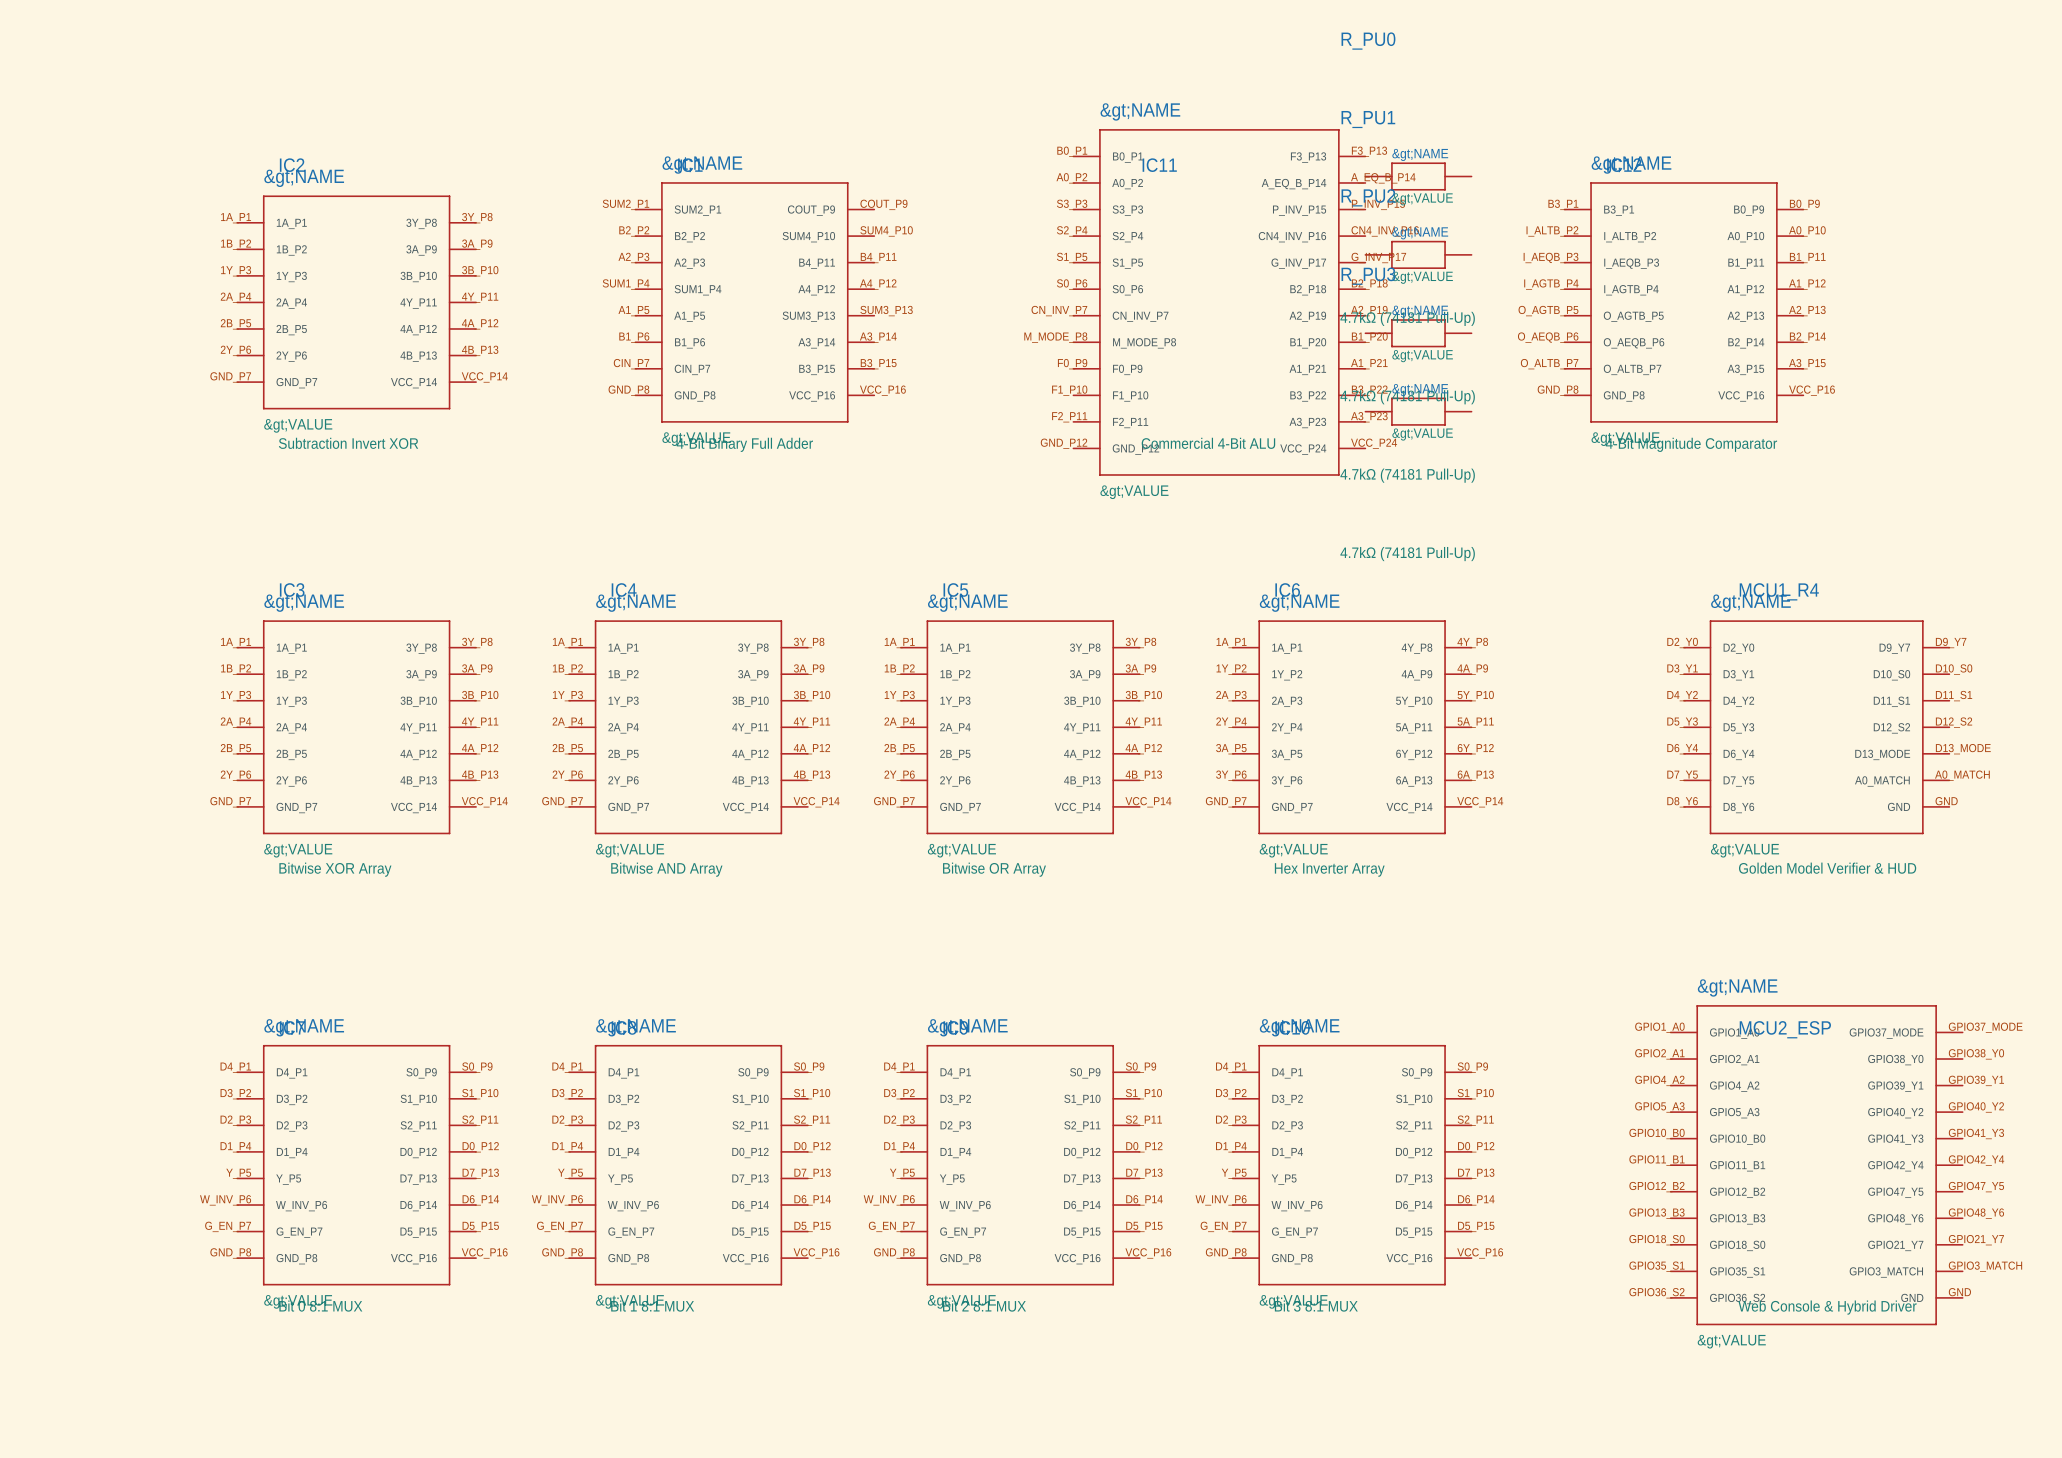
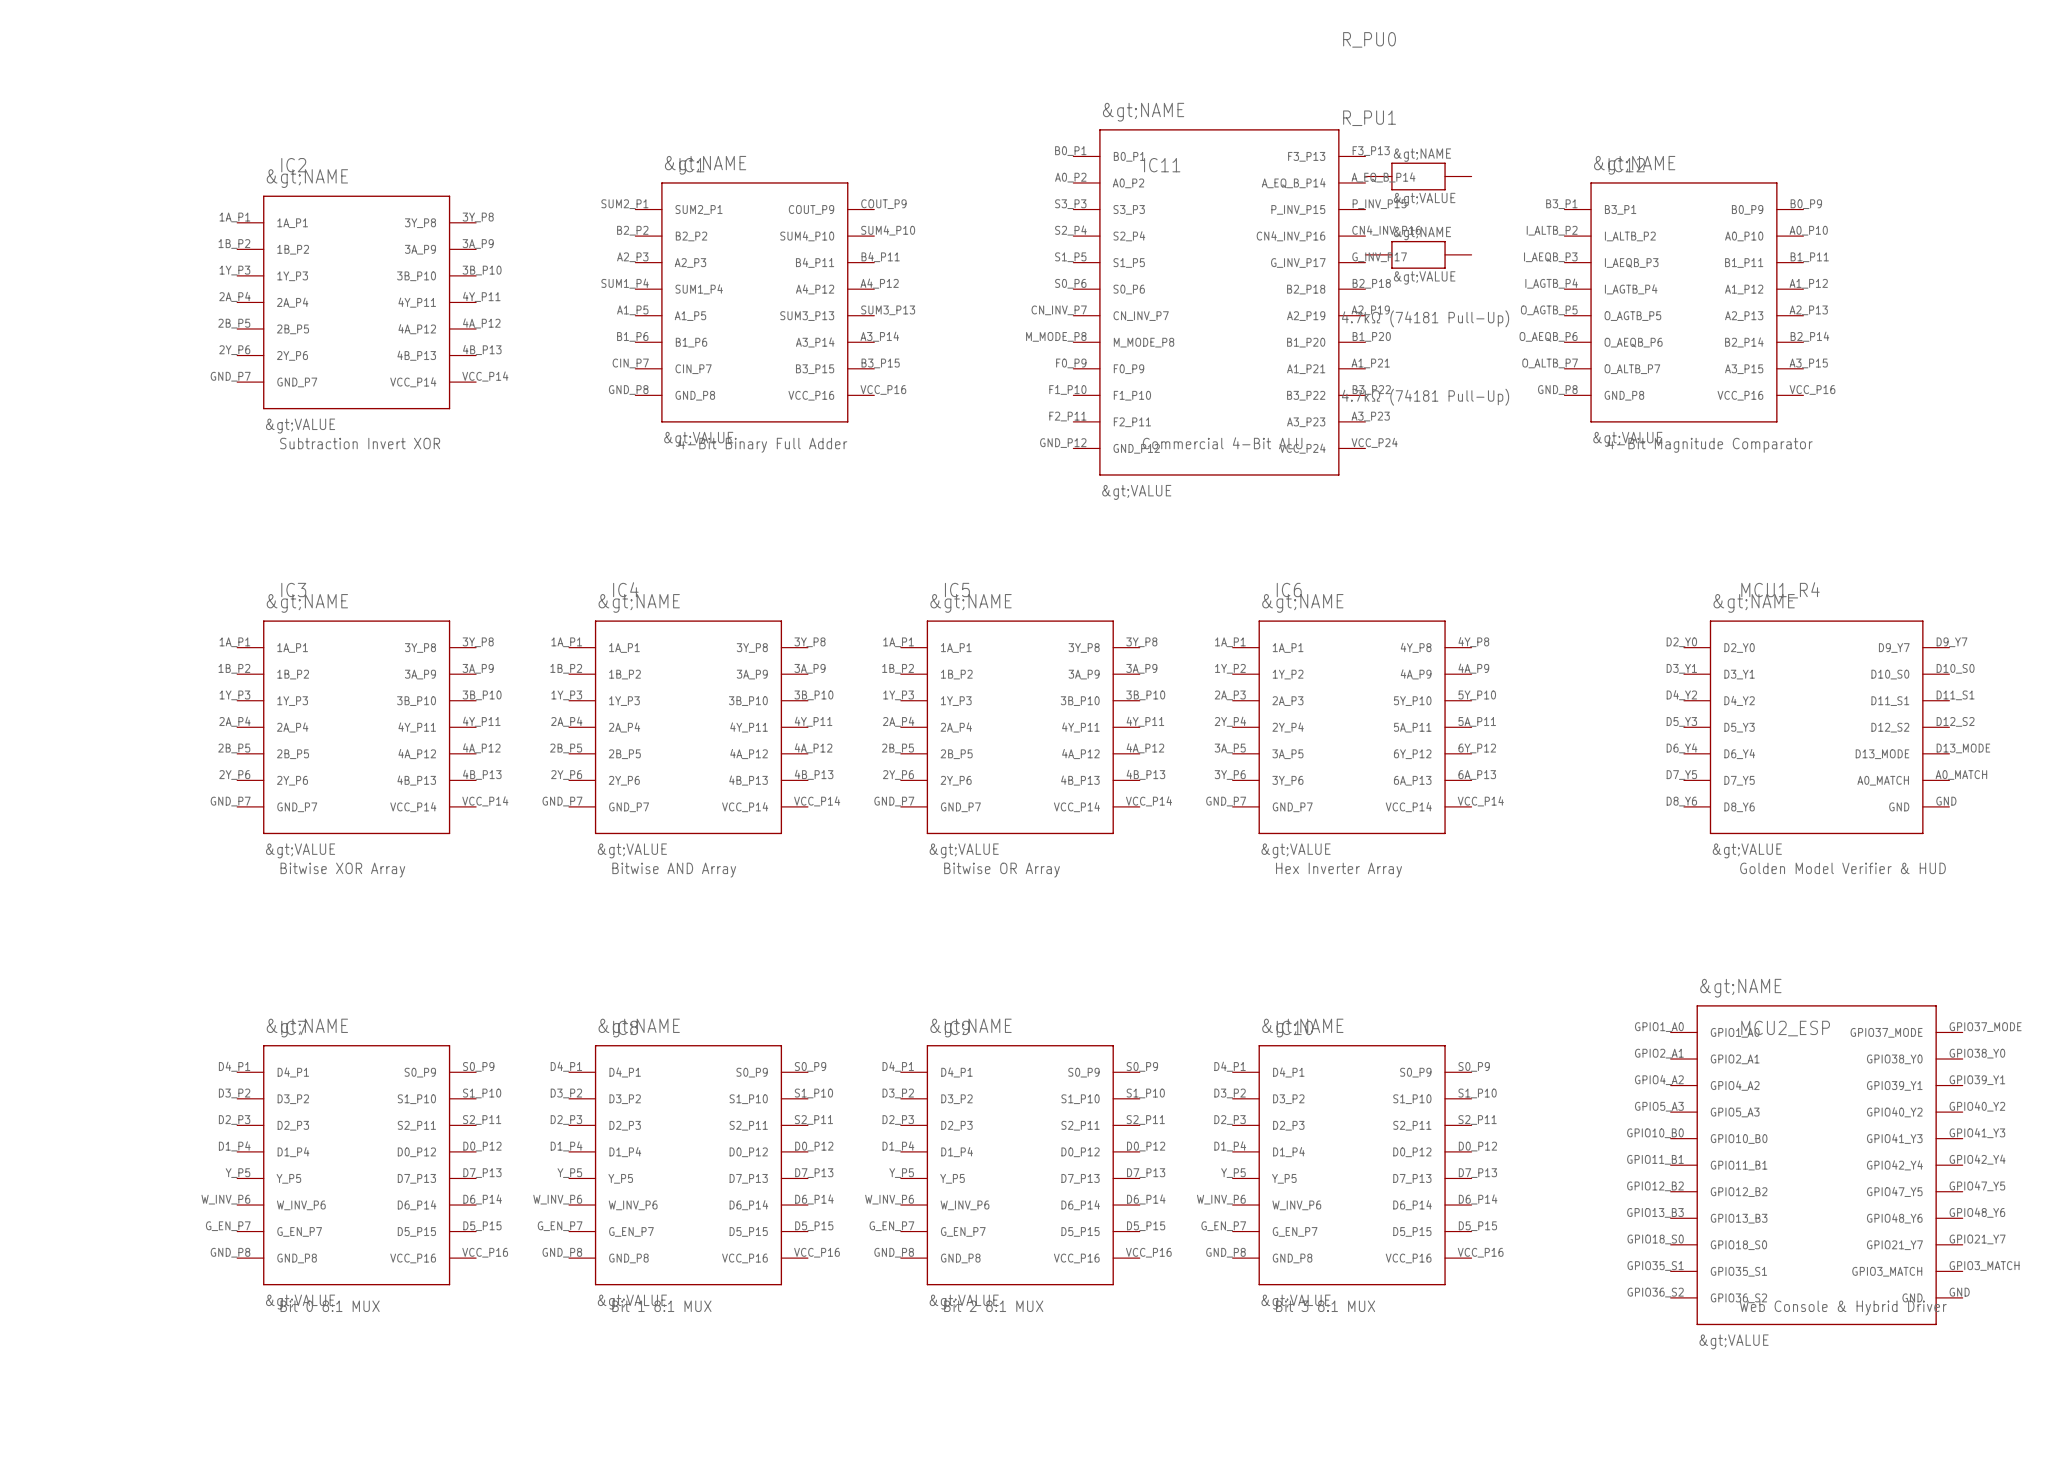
R_PU2: 4.7kΩ (74181 Pull-Up) (1418, 333) -> none
R_PU3: 4.7kΩ (74181 Pull-Up) (1418, 411) -> none

